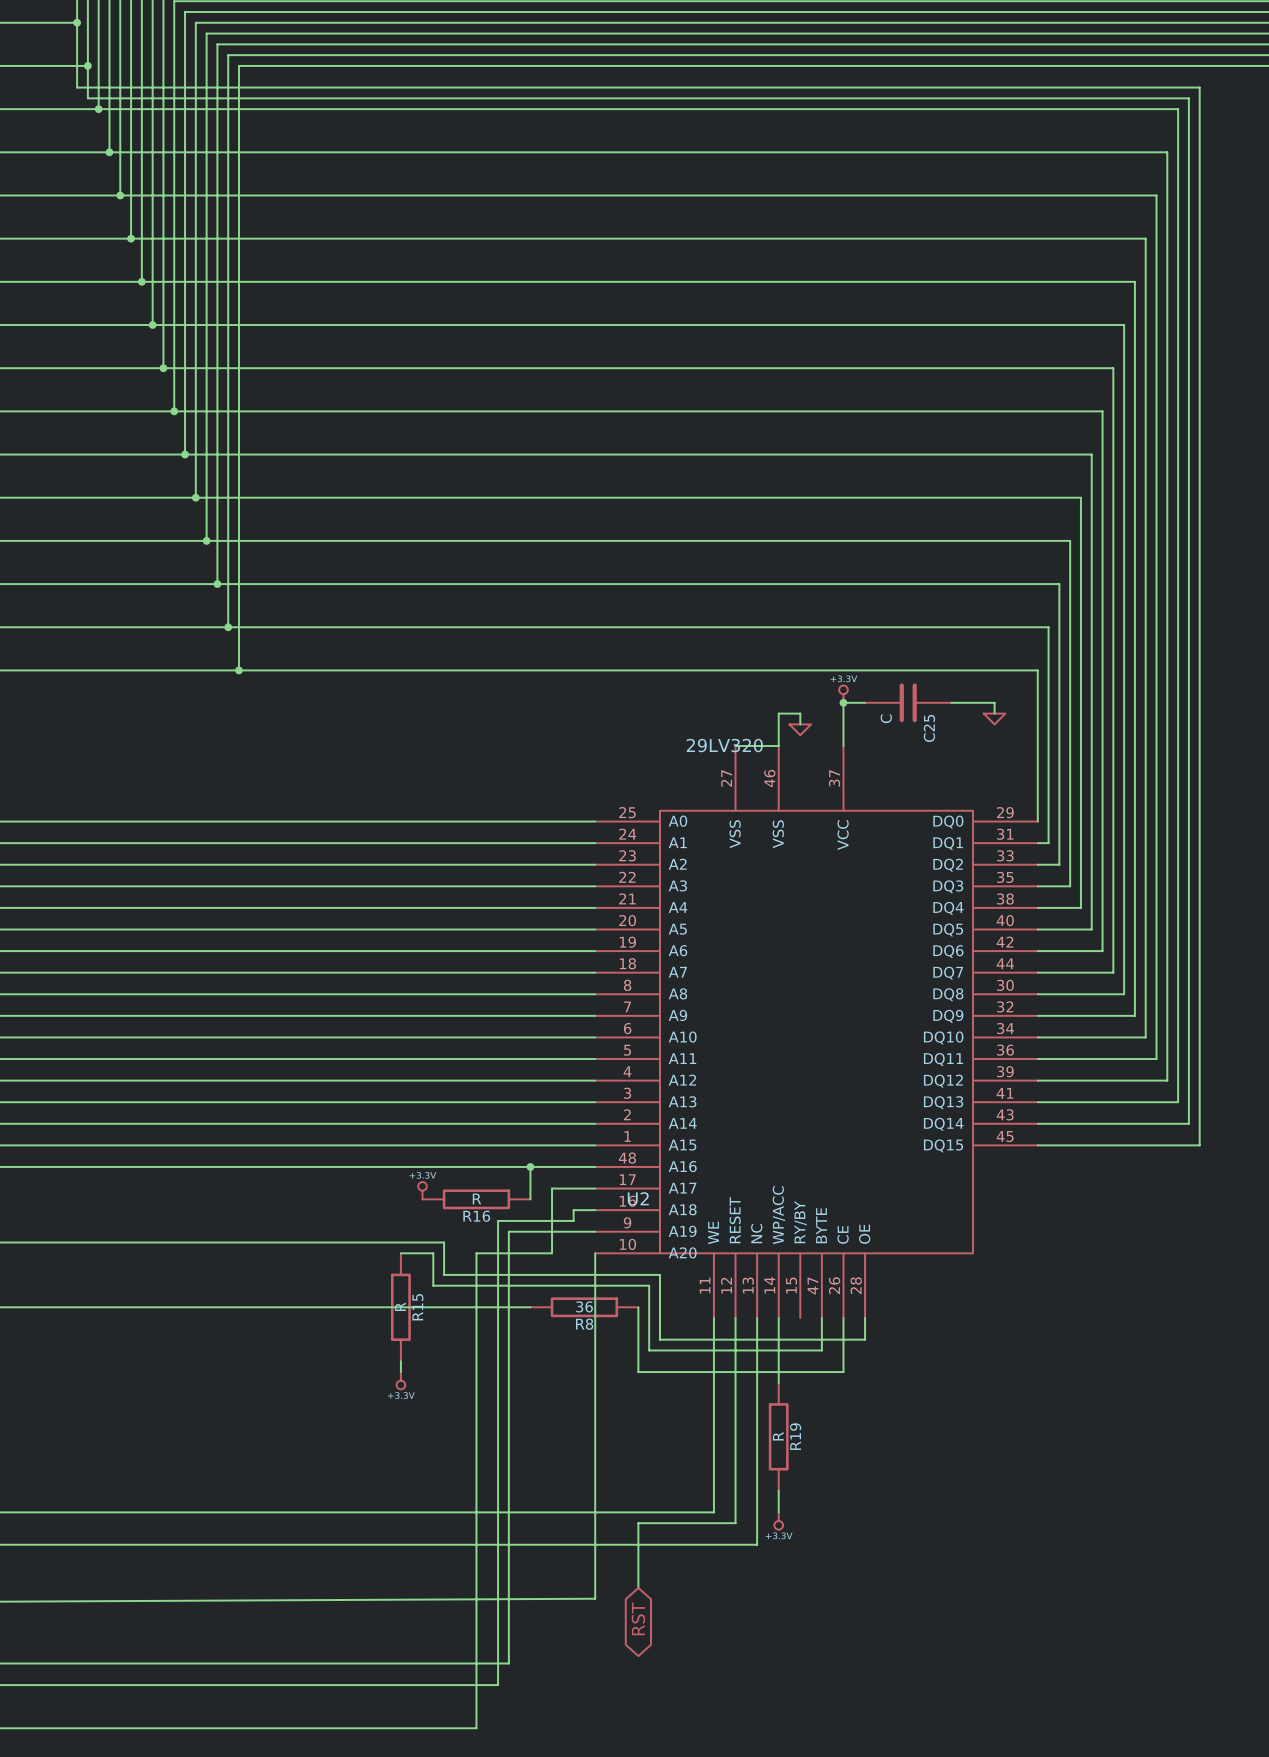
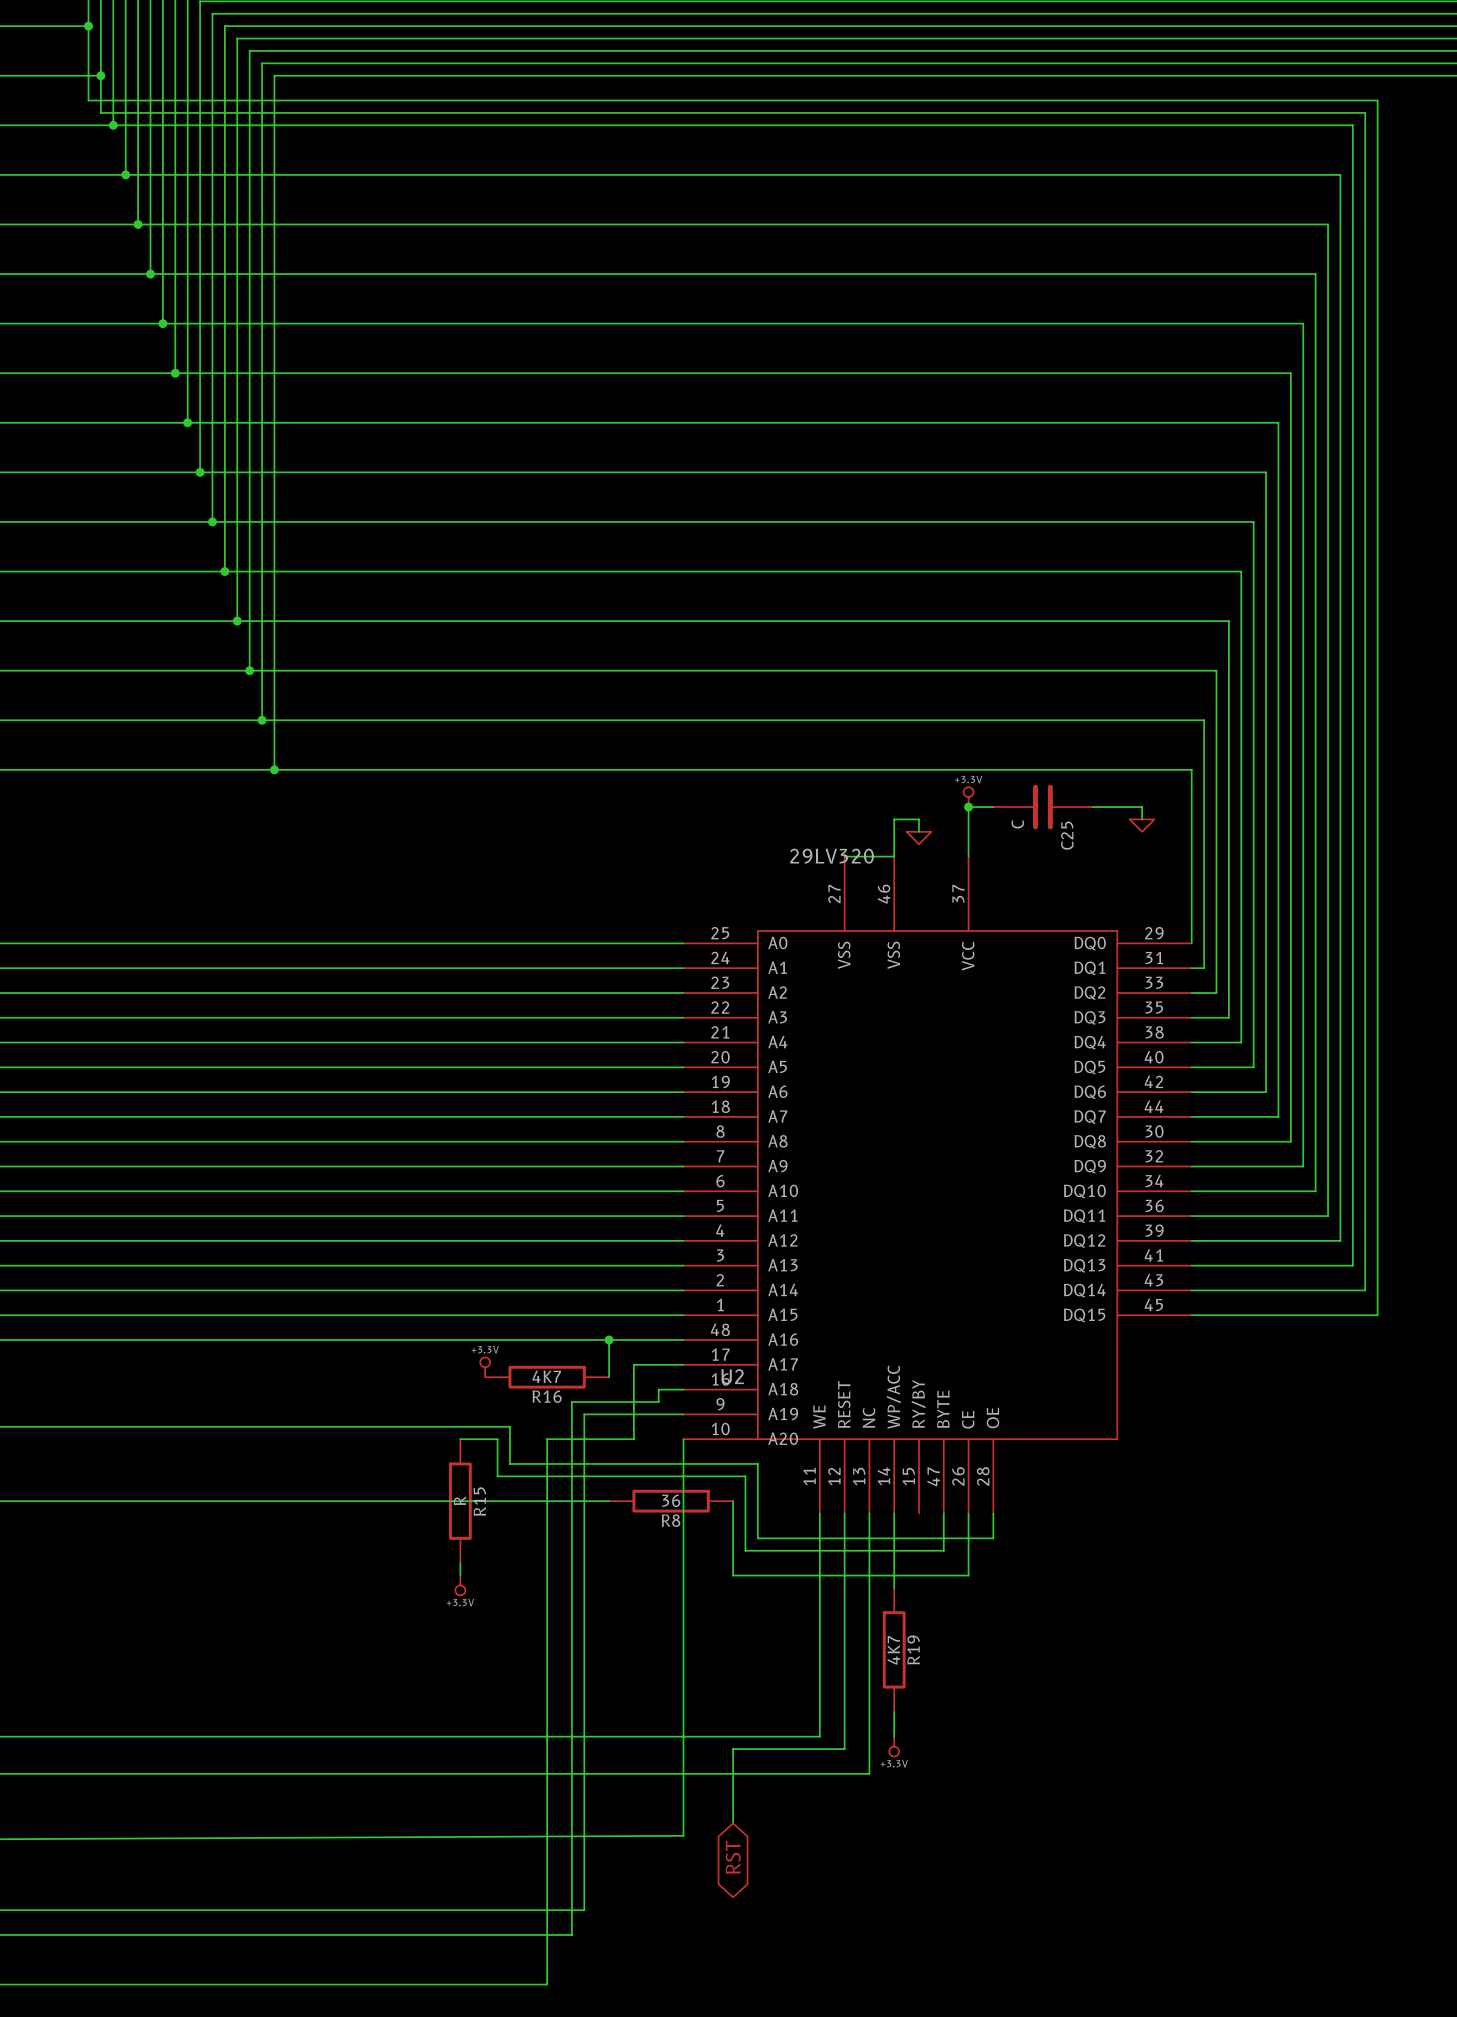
R16 value: R (476, 1198) -> 4K7 (546, 1376)
R19 value: R (778, 1436) -> 4K7 (893, 1650)

